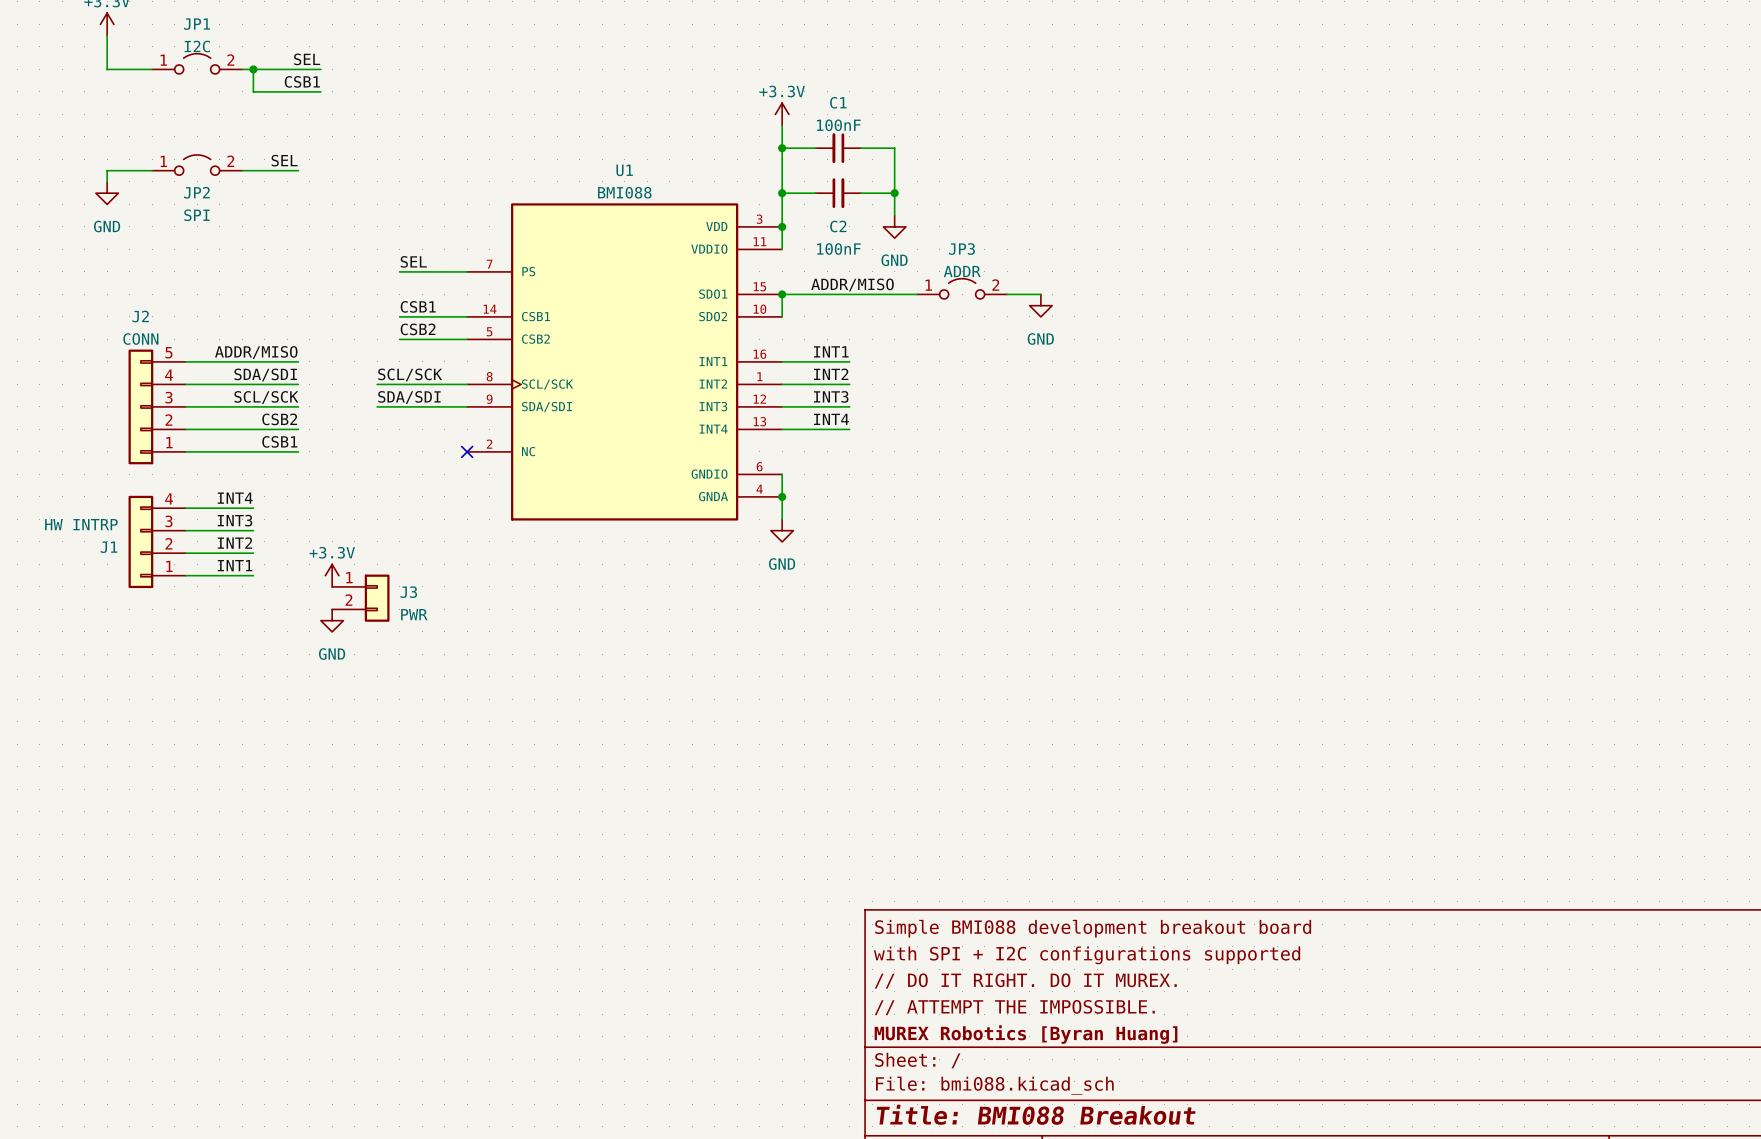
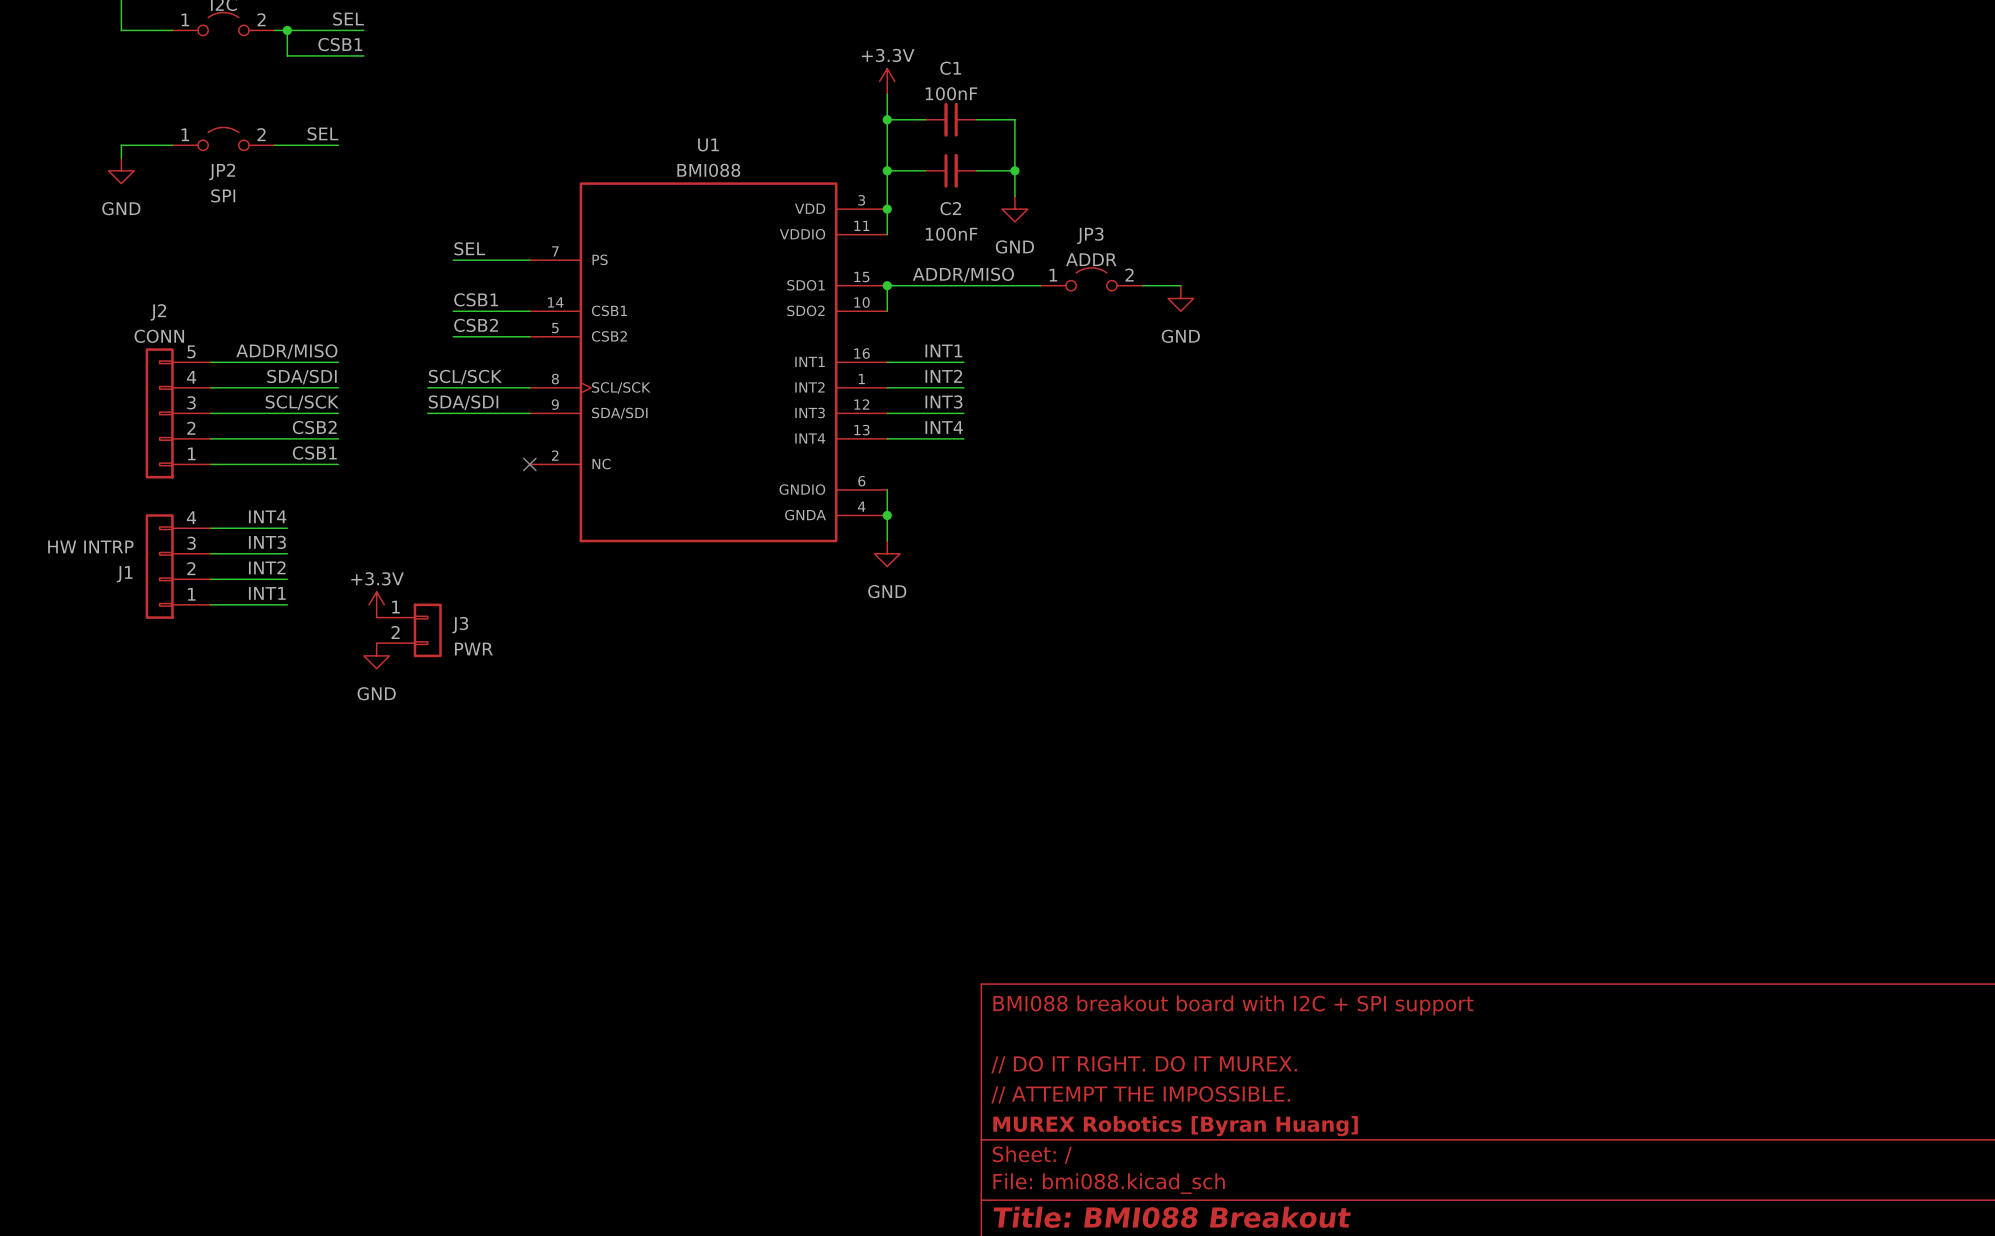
title block: Simple BMI088 development breakout board (1093, 928) -> BMI088 breakout board with I2C + SPI support (1233, 1005)
title block: with SPI + I2C configurations supported (1087, 955) -> none

